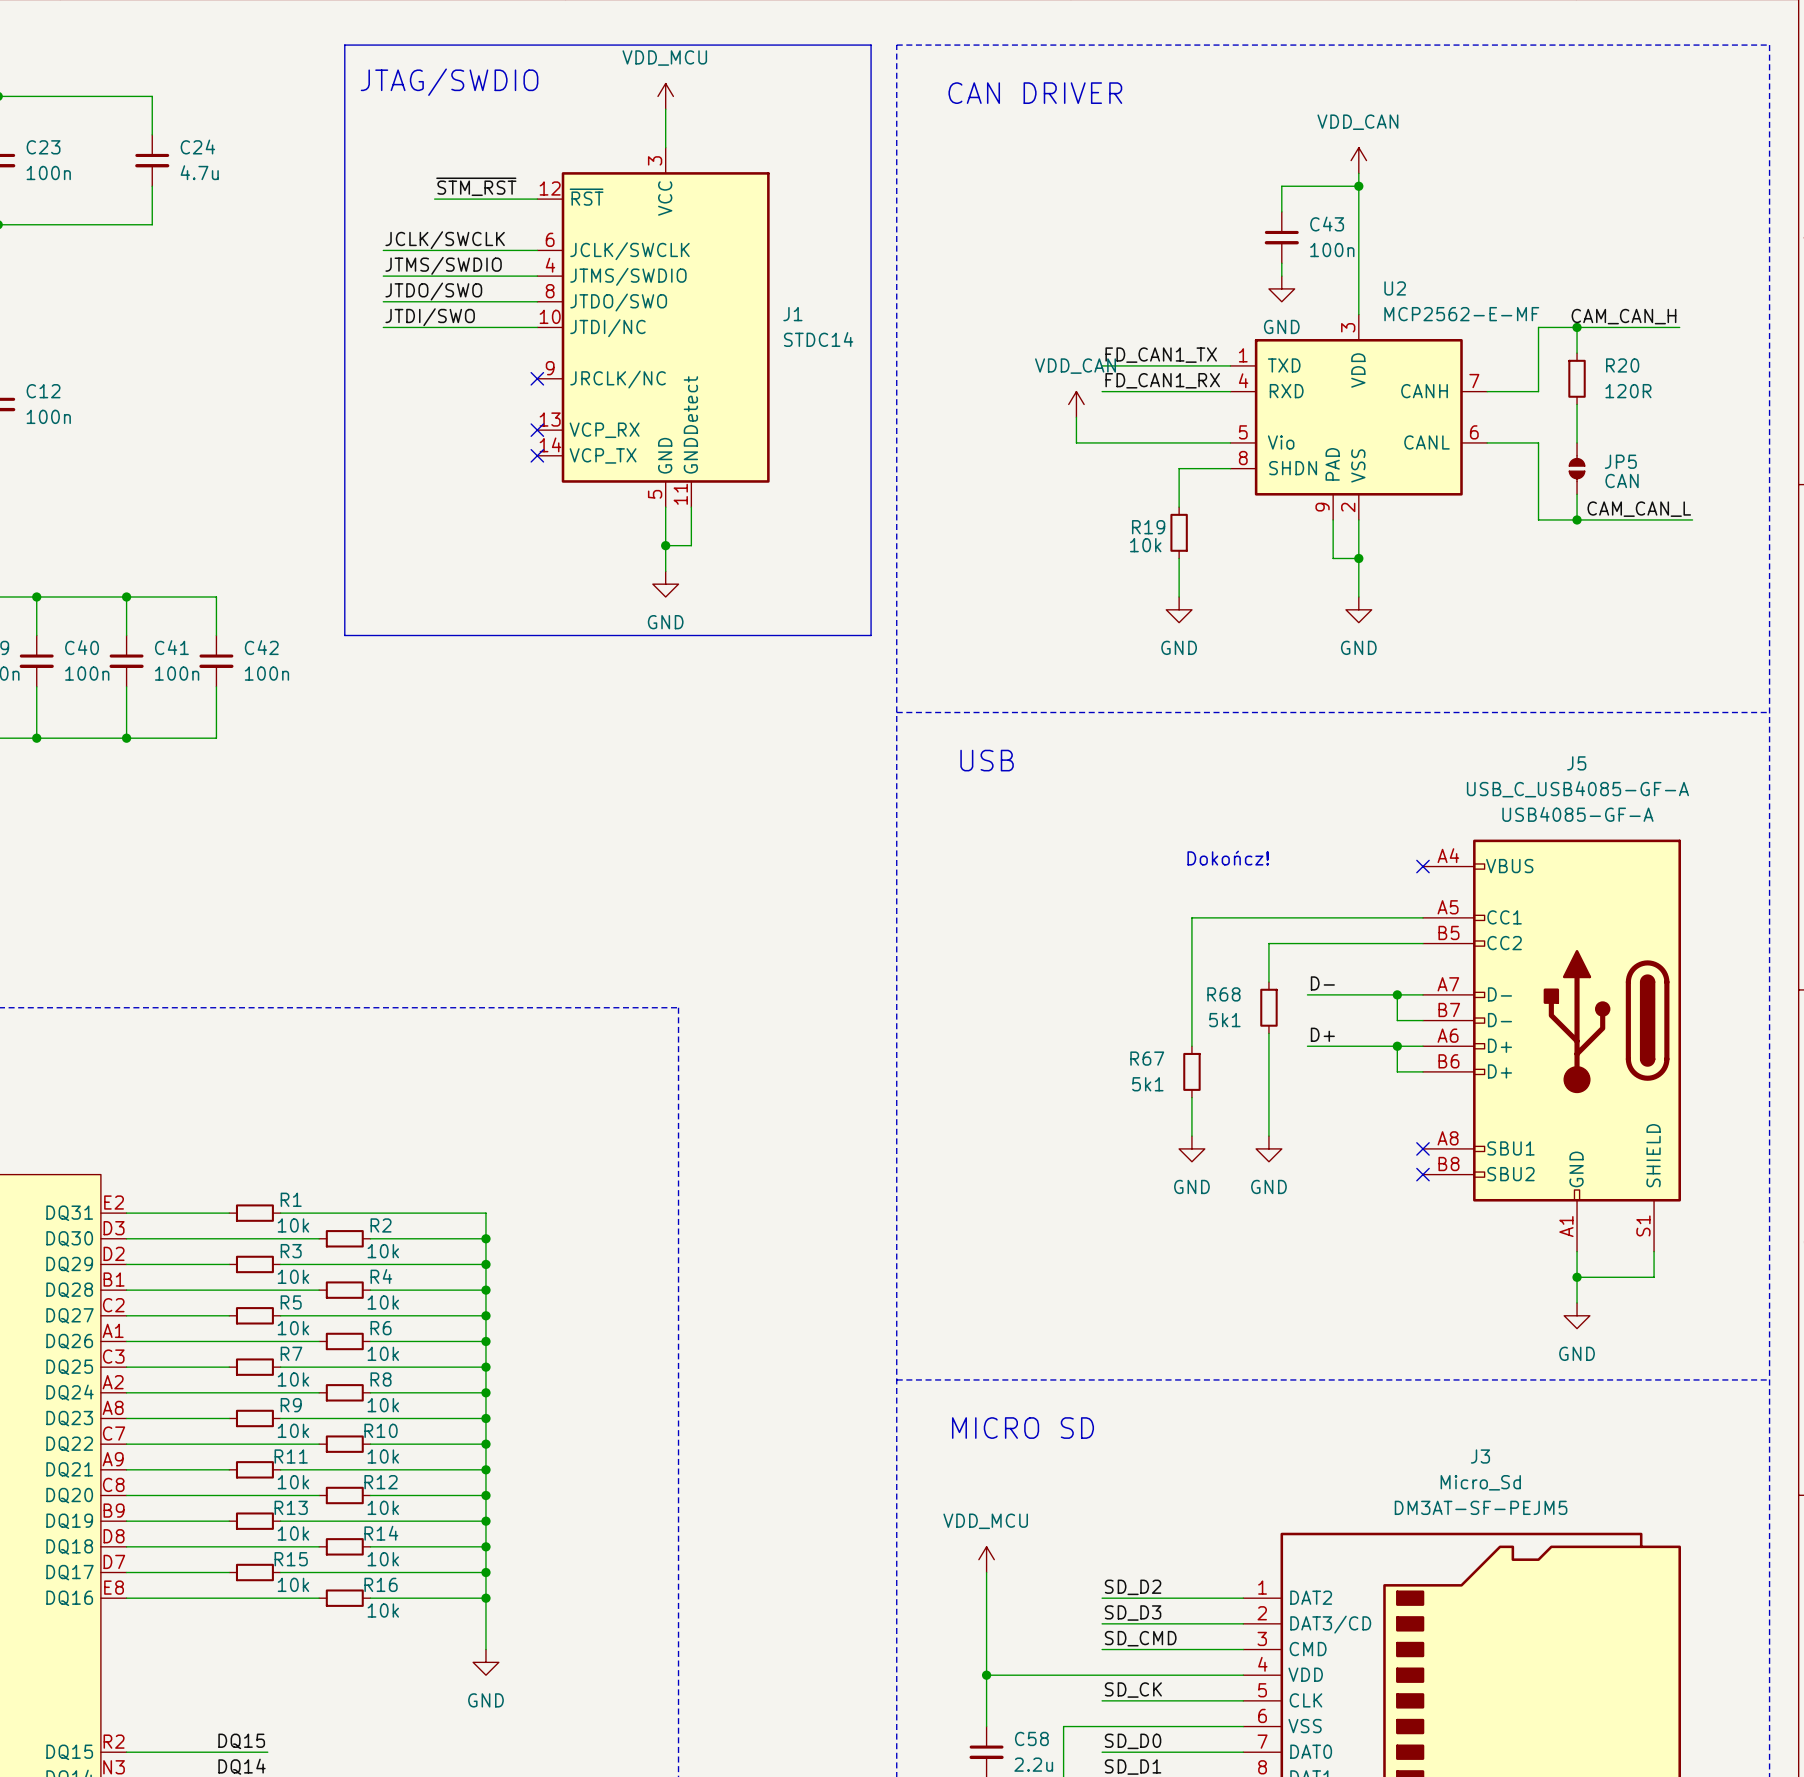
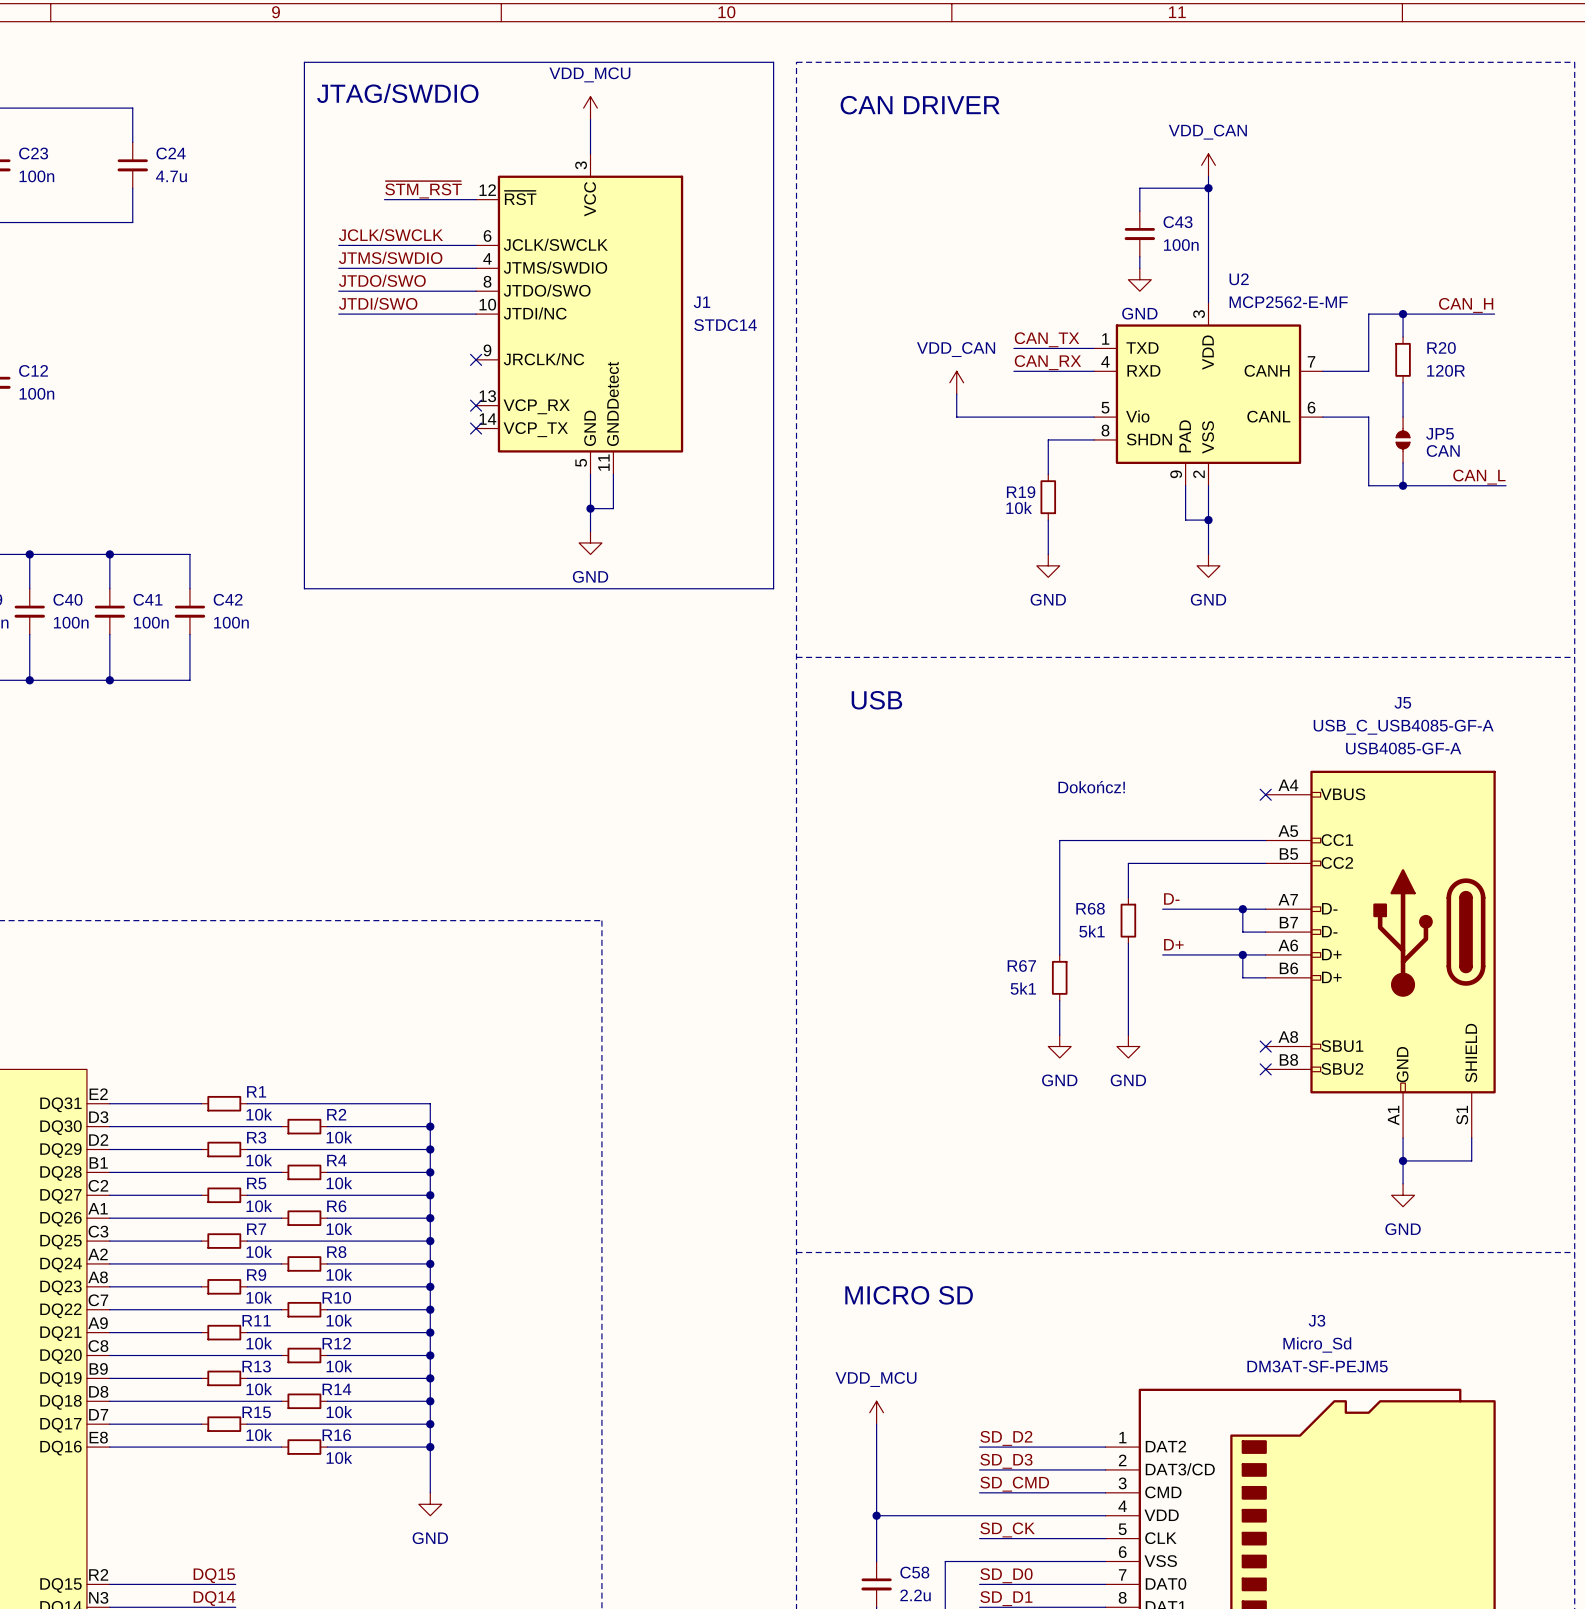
label: CAM_CAN_H (1623, 316) -> CAN_H (1466, 305)
label: FD_CAN1_TX (1161, 355) -> none
label: none -> CAN_TX (1047, 339)
wire: (1102, 365) (1140, 365) -> none
label: FD_CAN1_RX (1162, 380) -> none
label: none -> CAN_RX (1047, 362)
wire: (1102, 391) (1140, 391) -> none
label: CAM_CAN_L (1639, 509) -> CAN_L (1479, 477)

